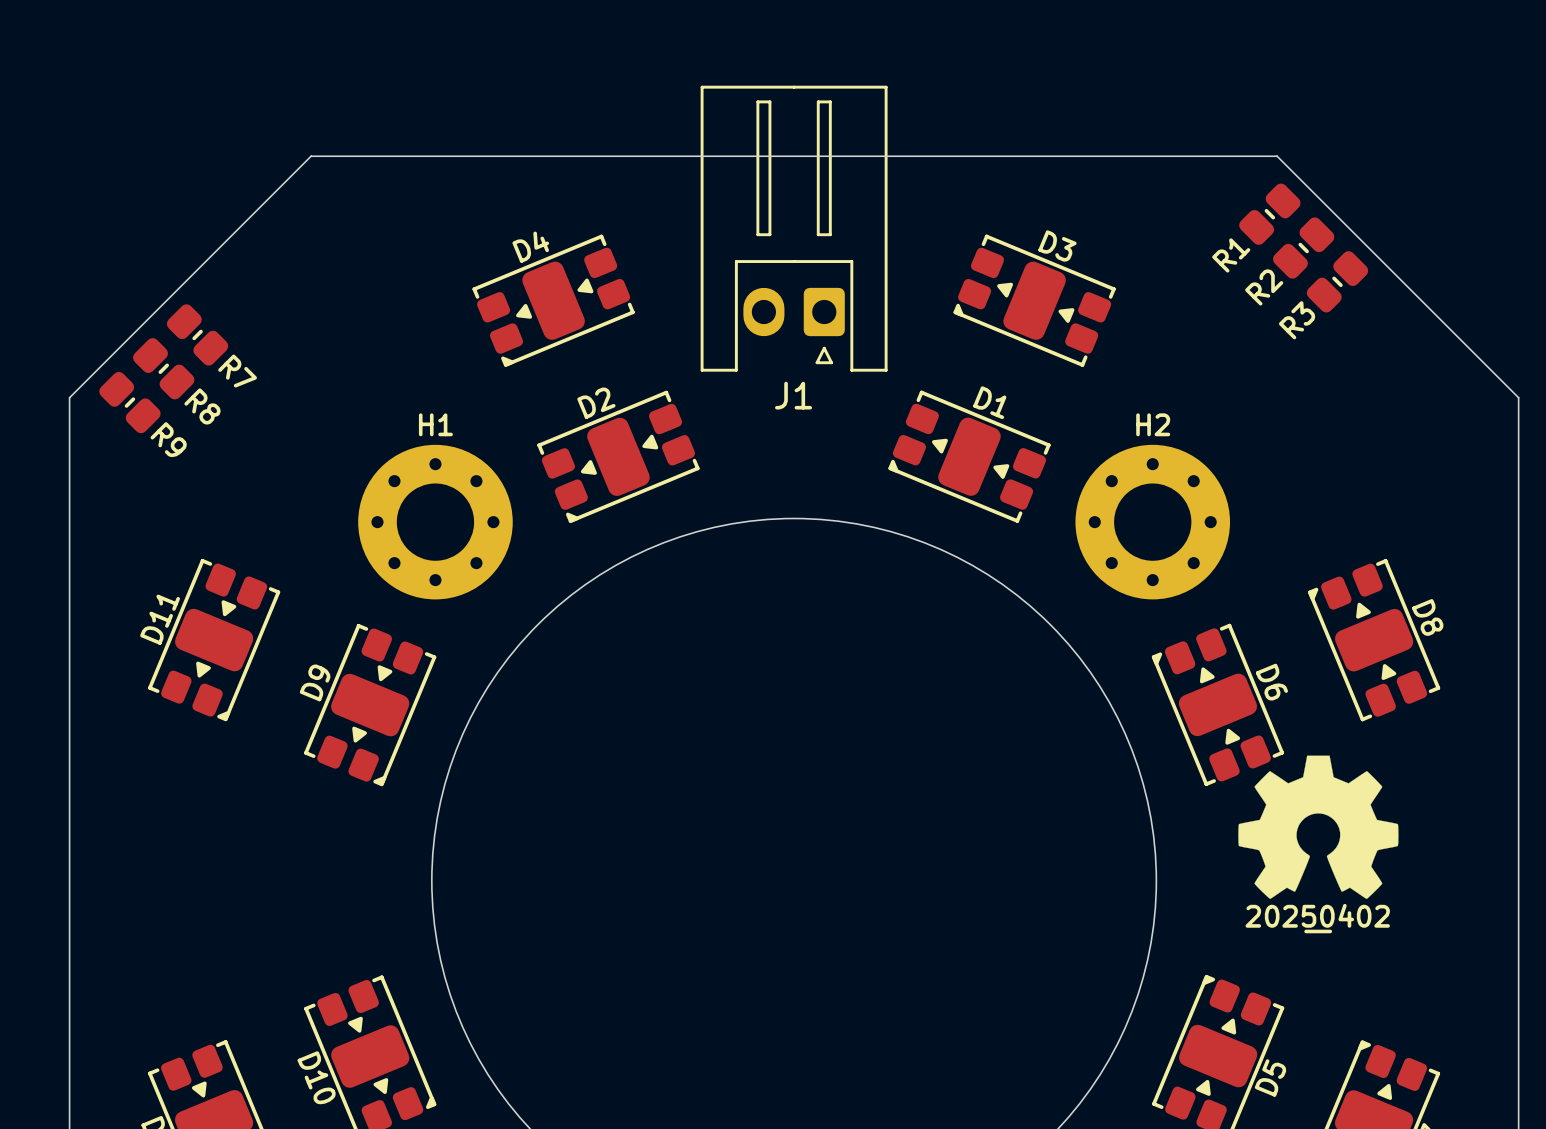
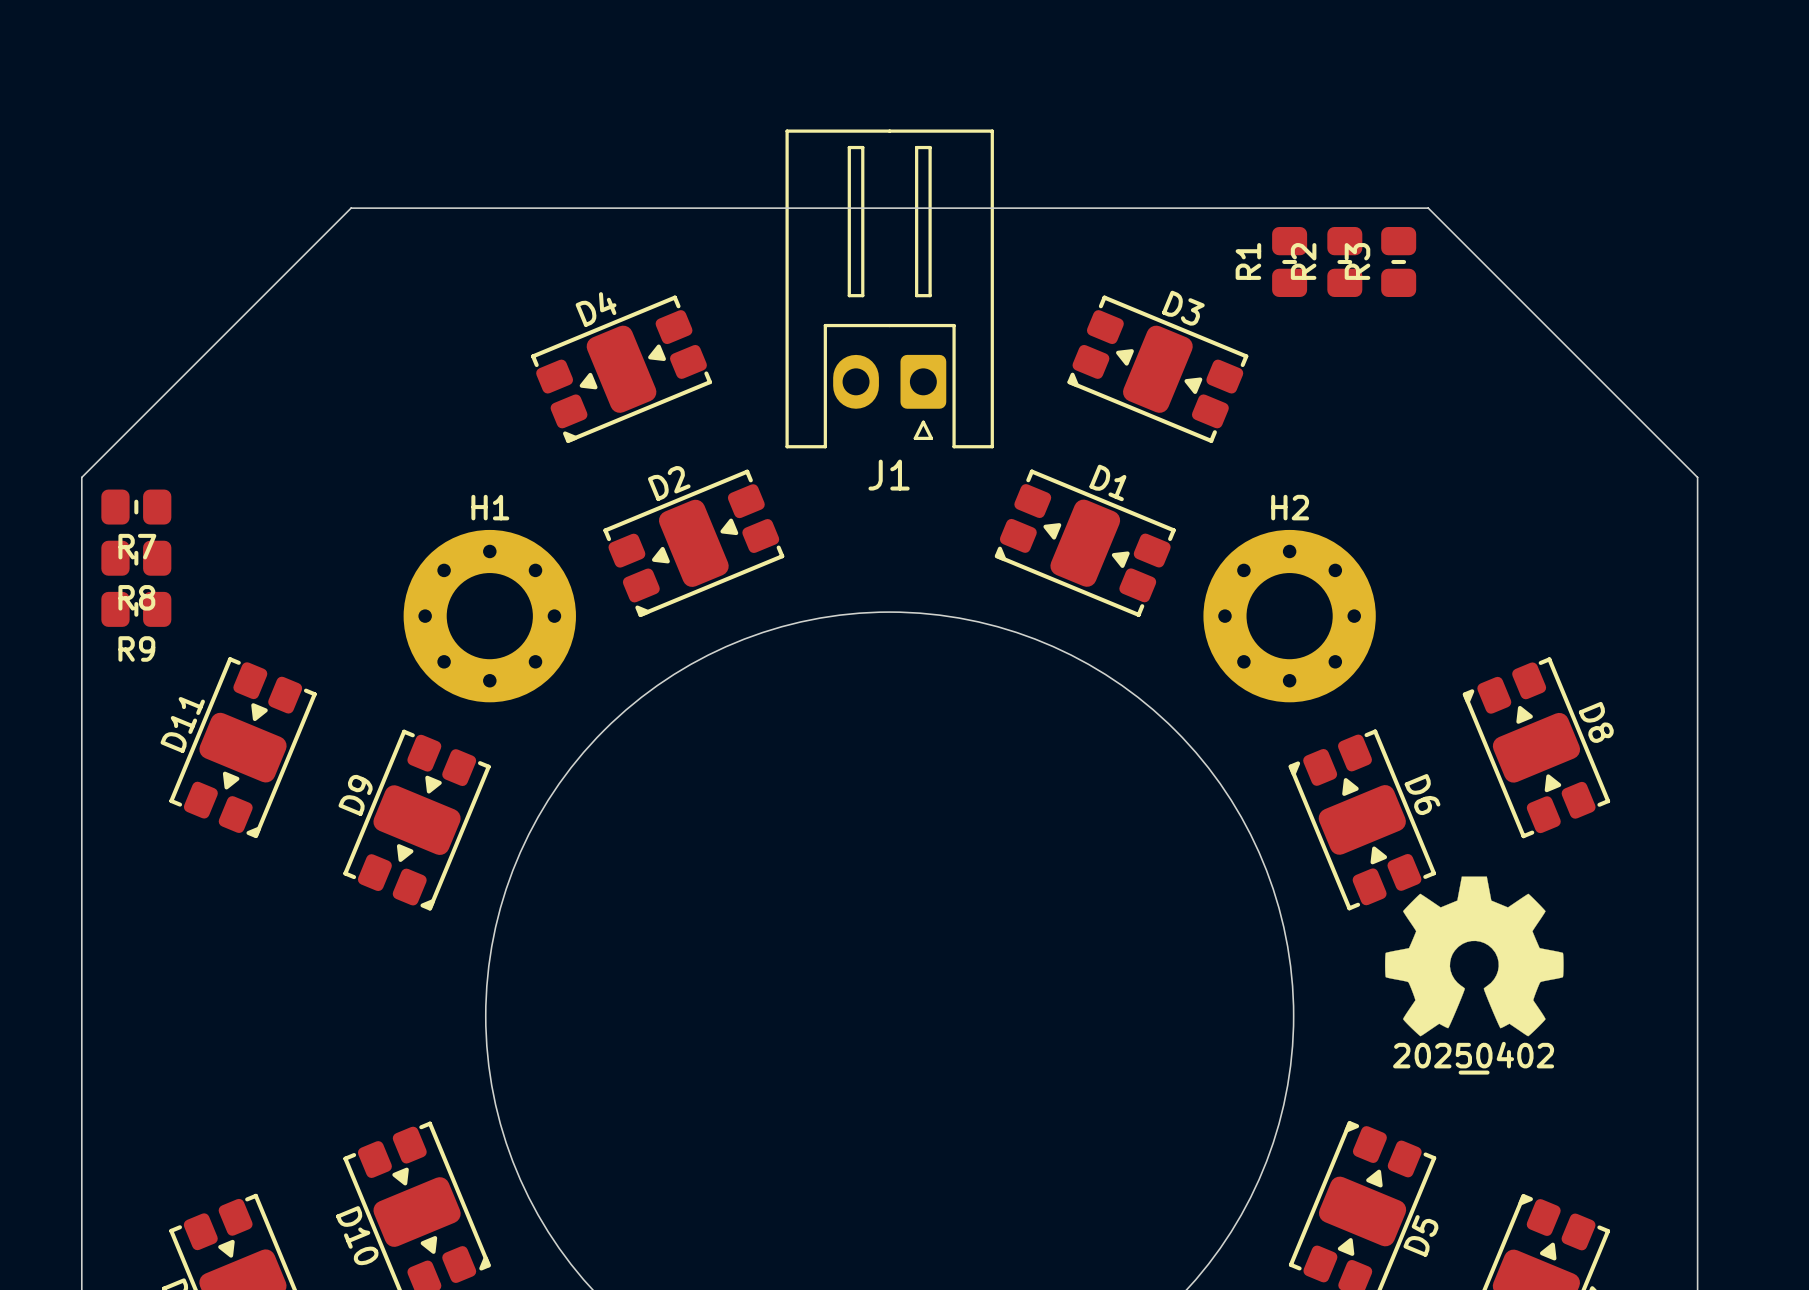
R1 rotation: 0° (1269, 214) -> 45° counterclockwise (1289, 261)
R1 position: (1269, 214) -> (1289, 261)
R2 rotation: 0° (1303, 248) -> 45° counterclockwise (1344, 261)
R2 position: (1303, 248) -> (1344, 261)
R3 rotation: 0° (1337, 281) -> 45° counterclockwise (1398, 261)
R3 position: (1337, 281) -> (1398, 261)
R7 rotation: 0° (197, 334) -> 45° counterclockwise (136, 507)
R7 position: (197, 334) -> (136, 507)
R8 rotation: 0° (163, 368) -> 45° counterclockwise (136, 558)
R8 position: (163, 368) -> (136, 558)
R9 rotation: 0° (129, 402) -> 45° counterclockwise (136, 609)
R9 position: (129, 402) -> (136, 609)

